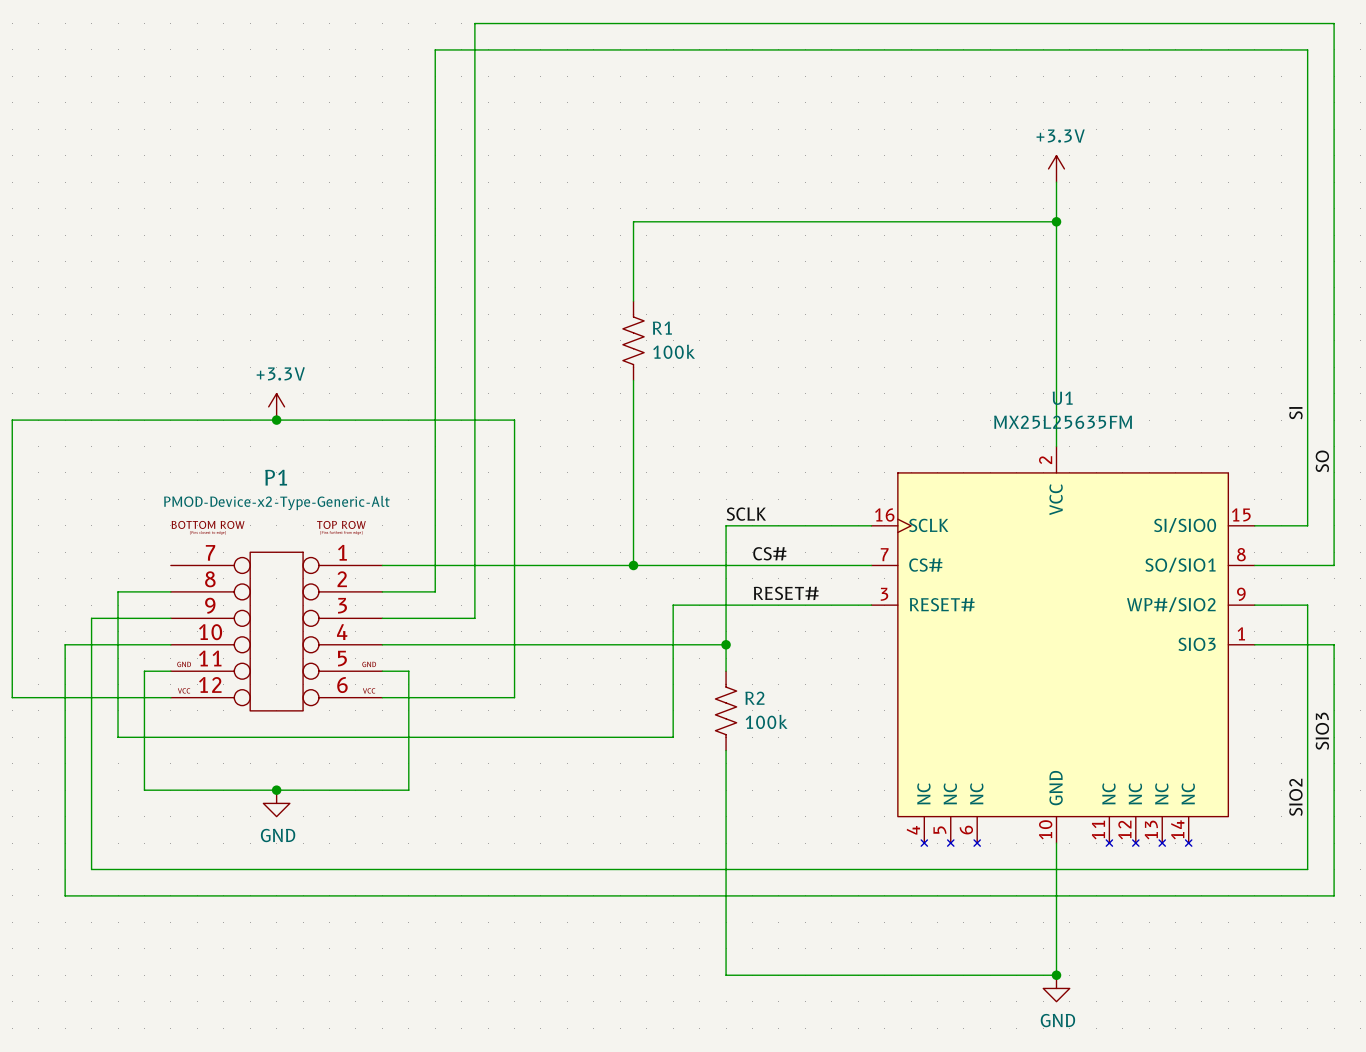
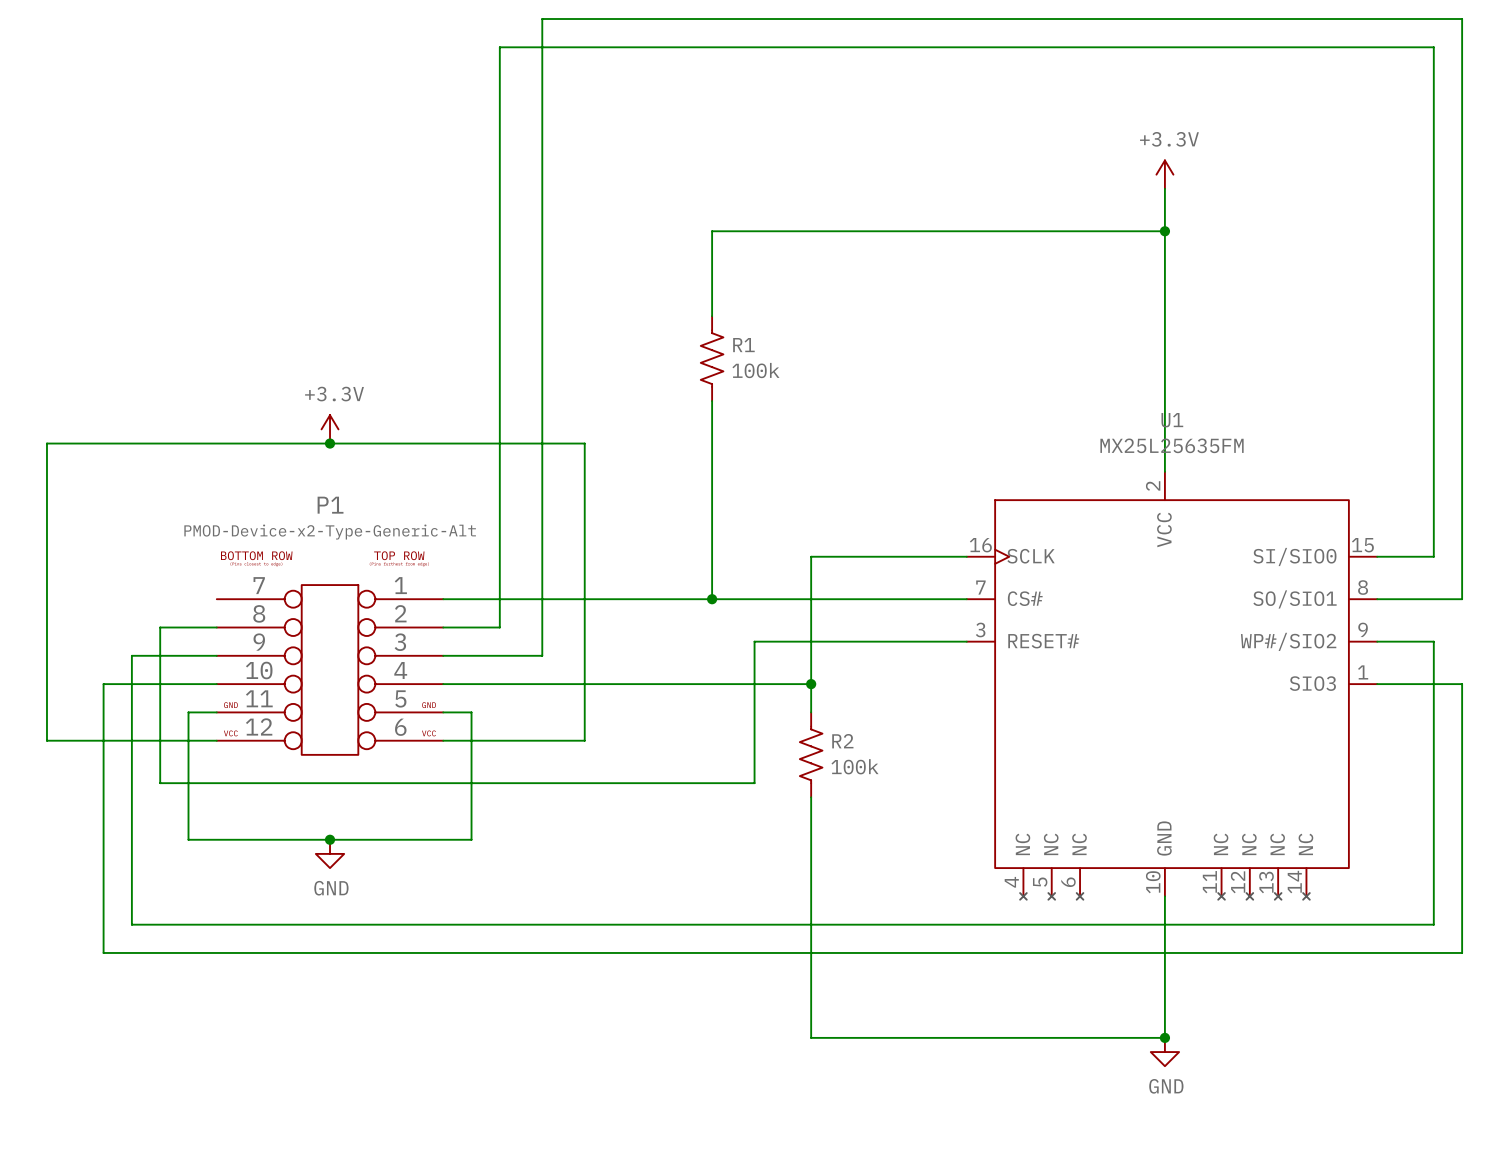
label: SI (1295, 413) -> none
label: SO (1322, 461) -> none
label: SCLK (746, 514) -> none
label: CS# (769, 553) -> none
label: RESET# (786, 593) -> none
label: SIO3 (1322, 731) -> none
label: SIO2 (1295, 797) -> none

